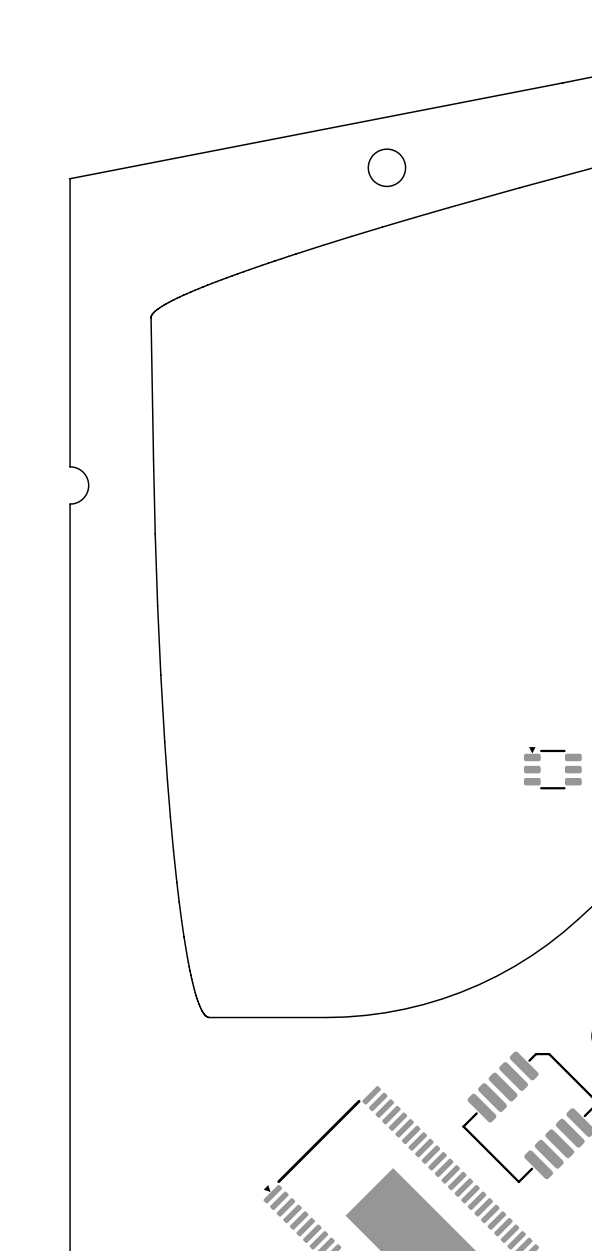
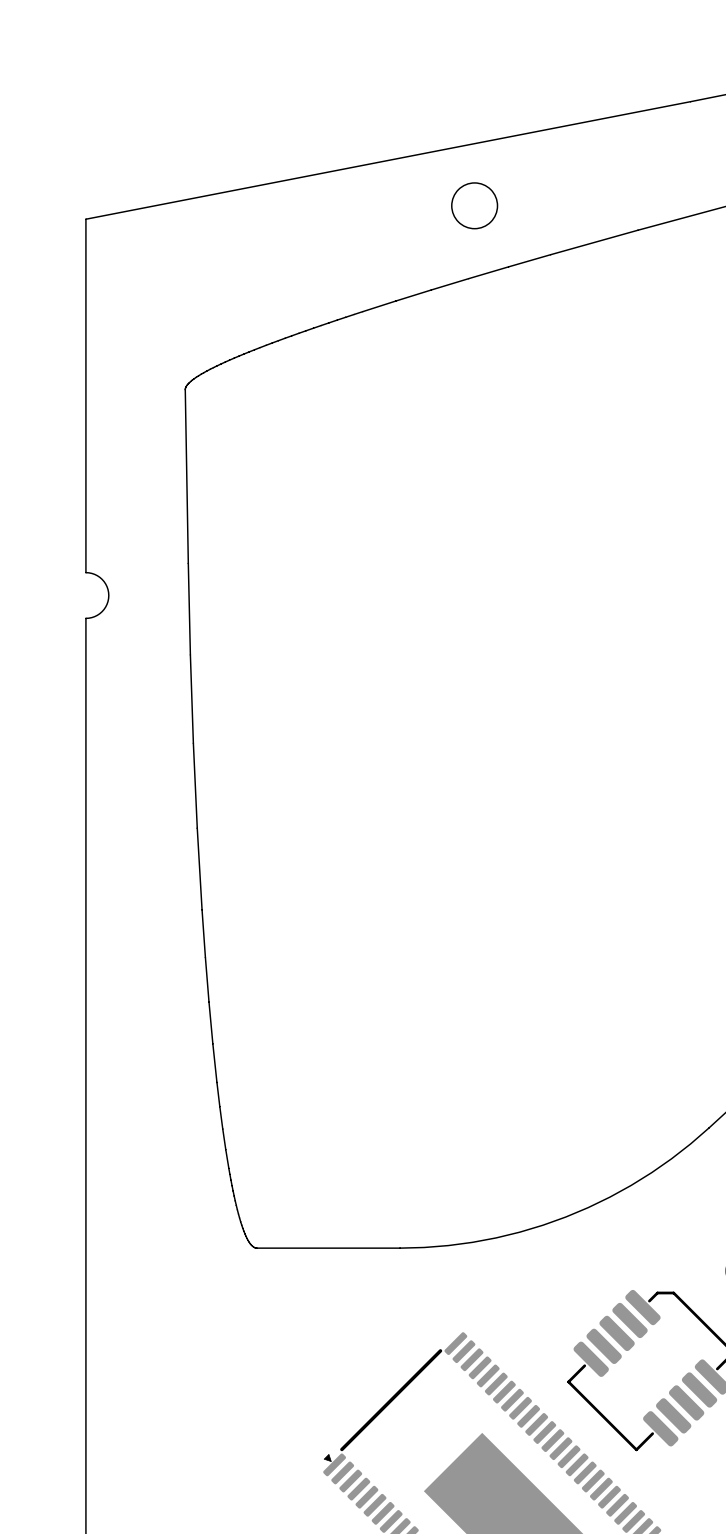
part: (552, 768) -> none

